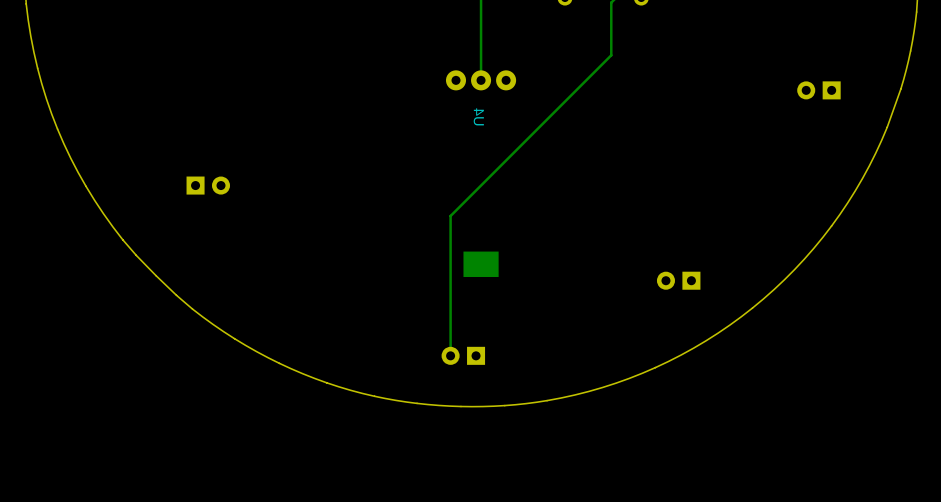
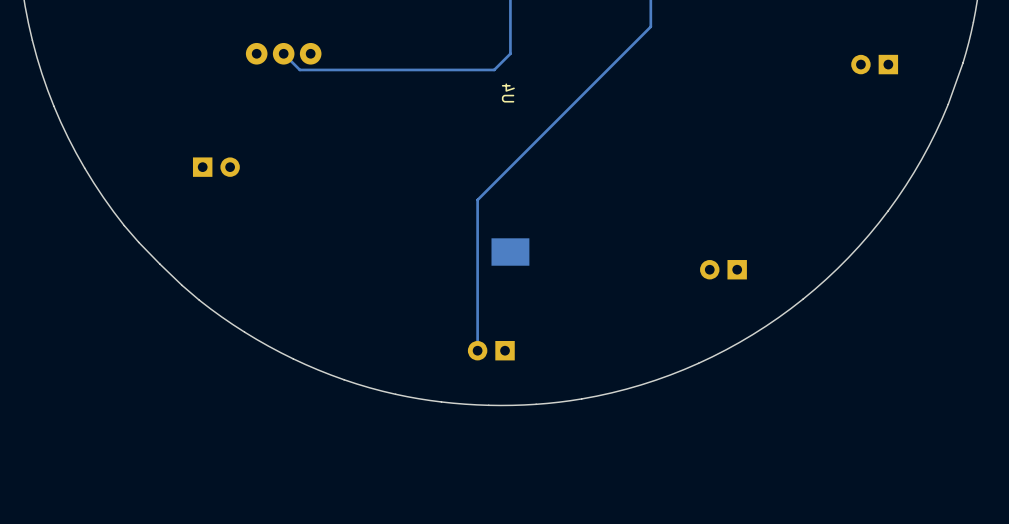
track: none -> (510, 53) (494, 69) (299, 69) (283, 53)
part position: (481, 80) -> (283, 53)

